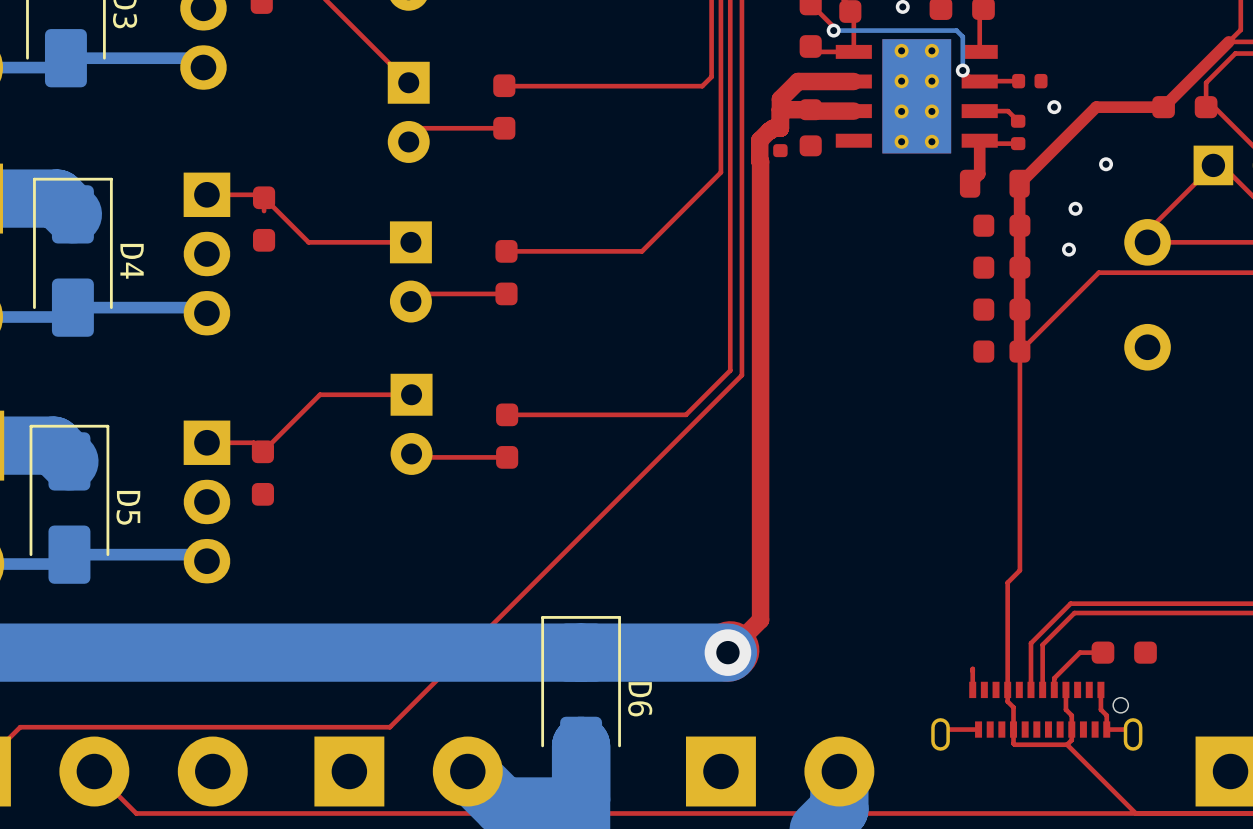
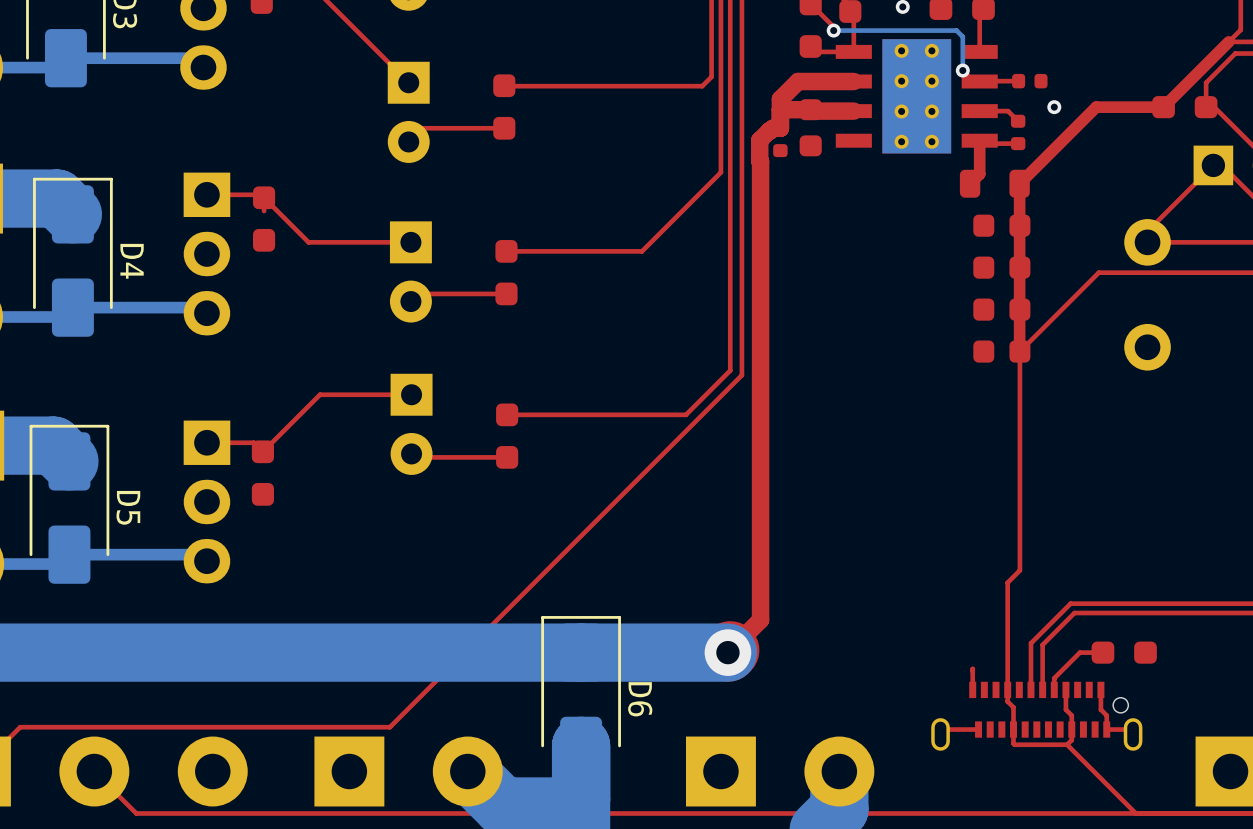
via: (1106, 164) -> none
via: (1075, 208) -> none
via: (1068, 249) -> none

